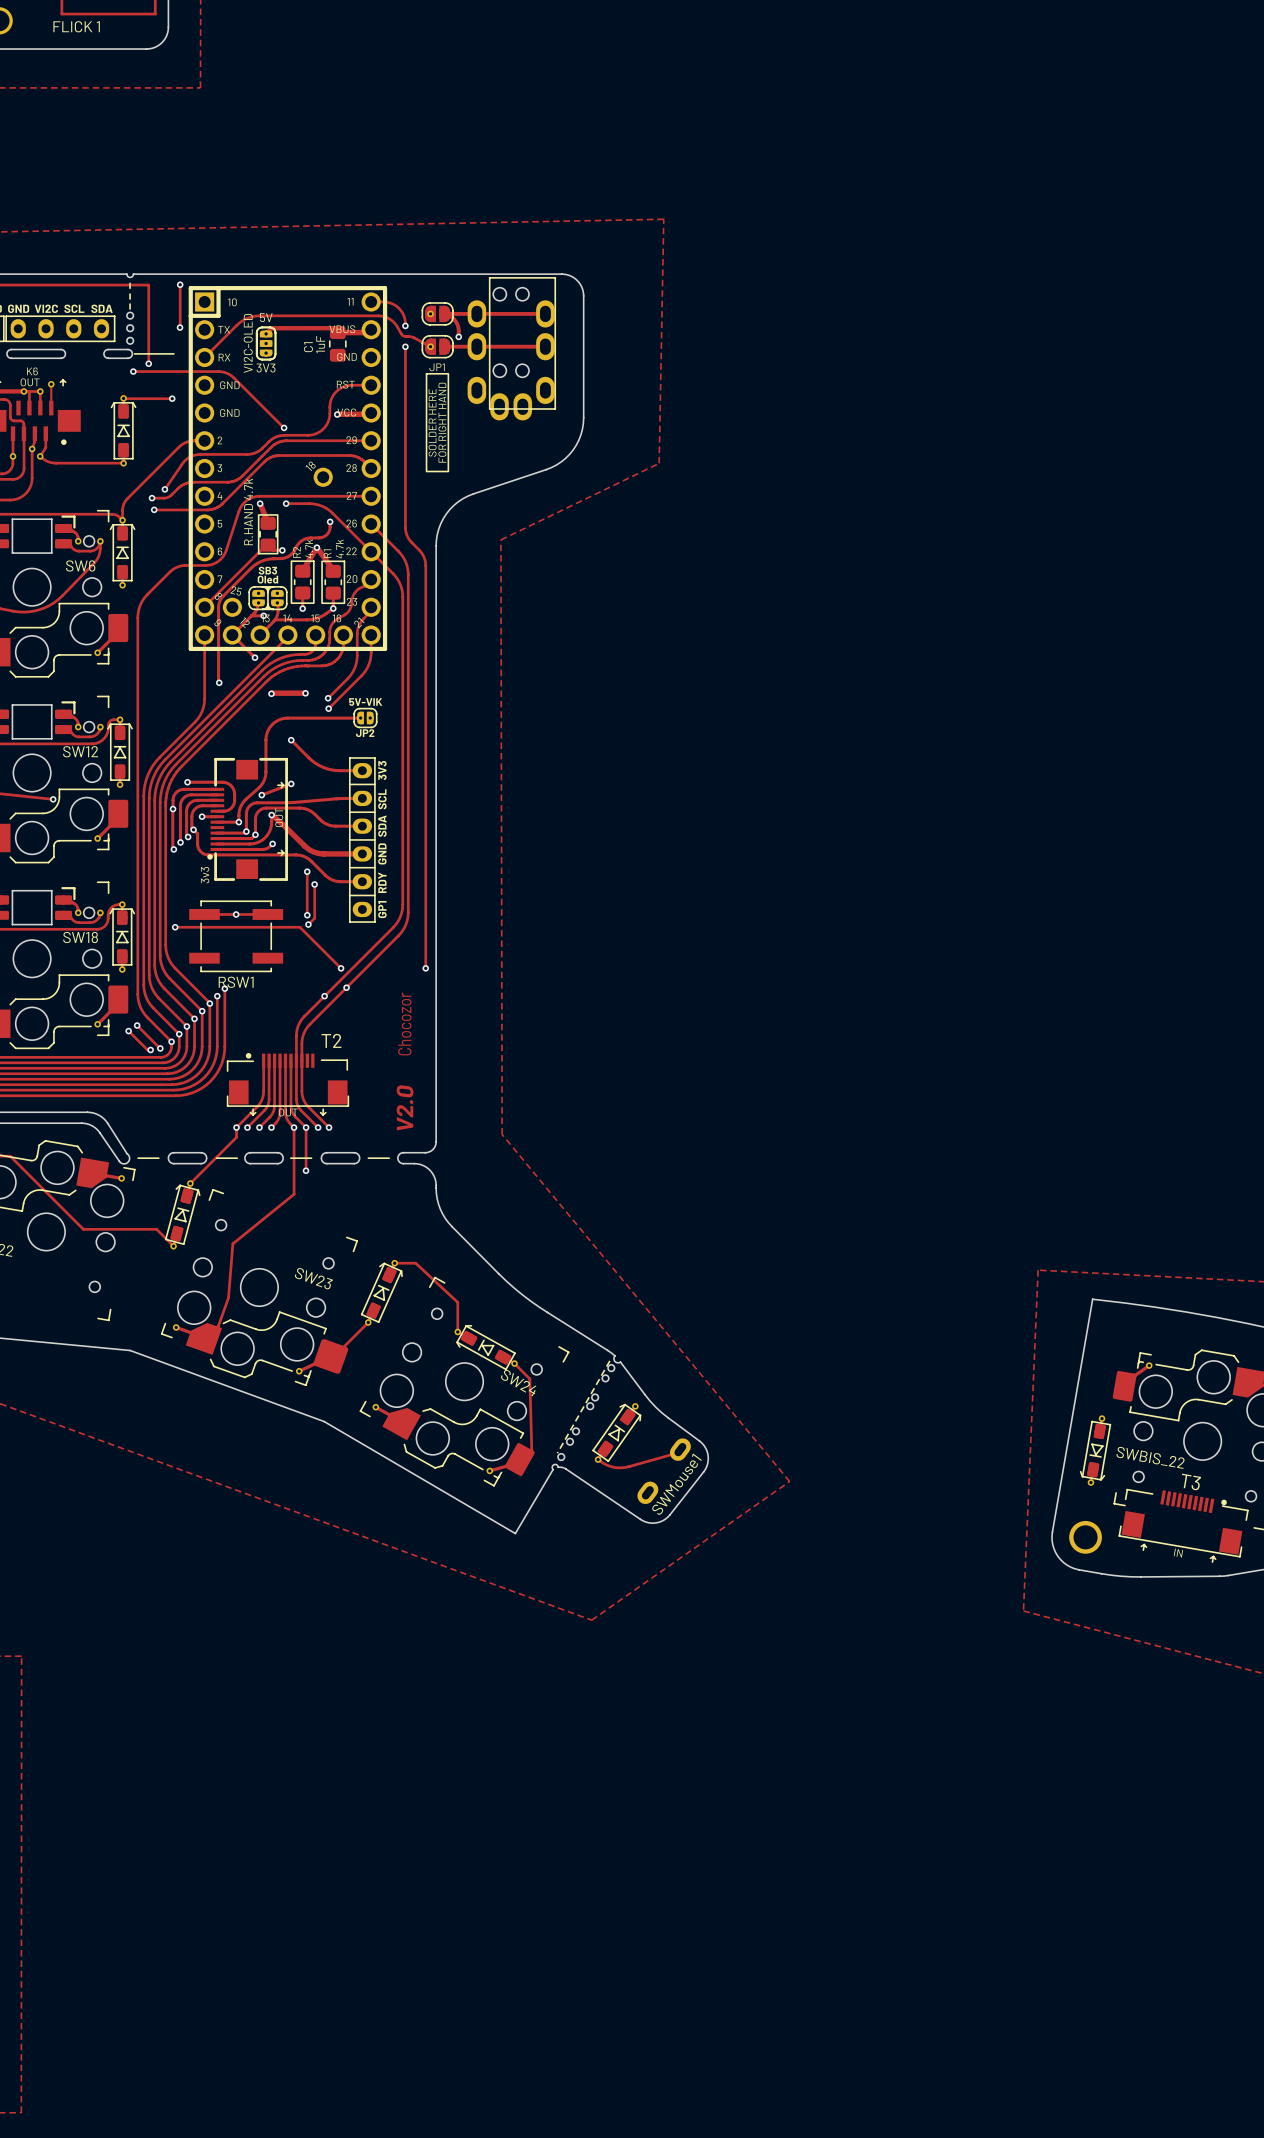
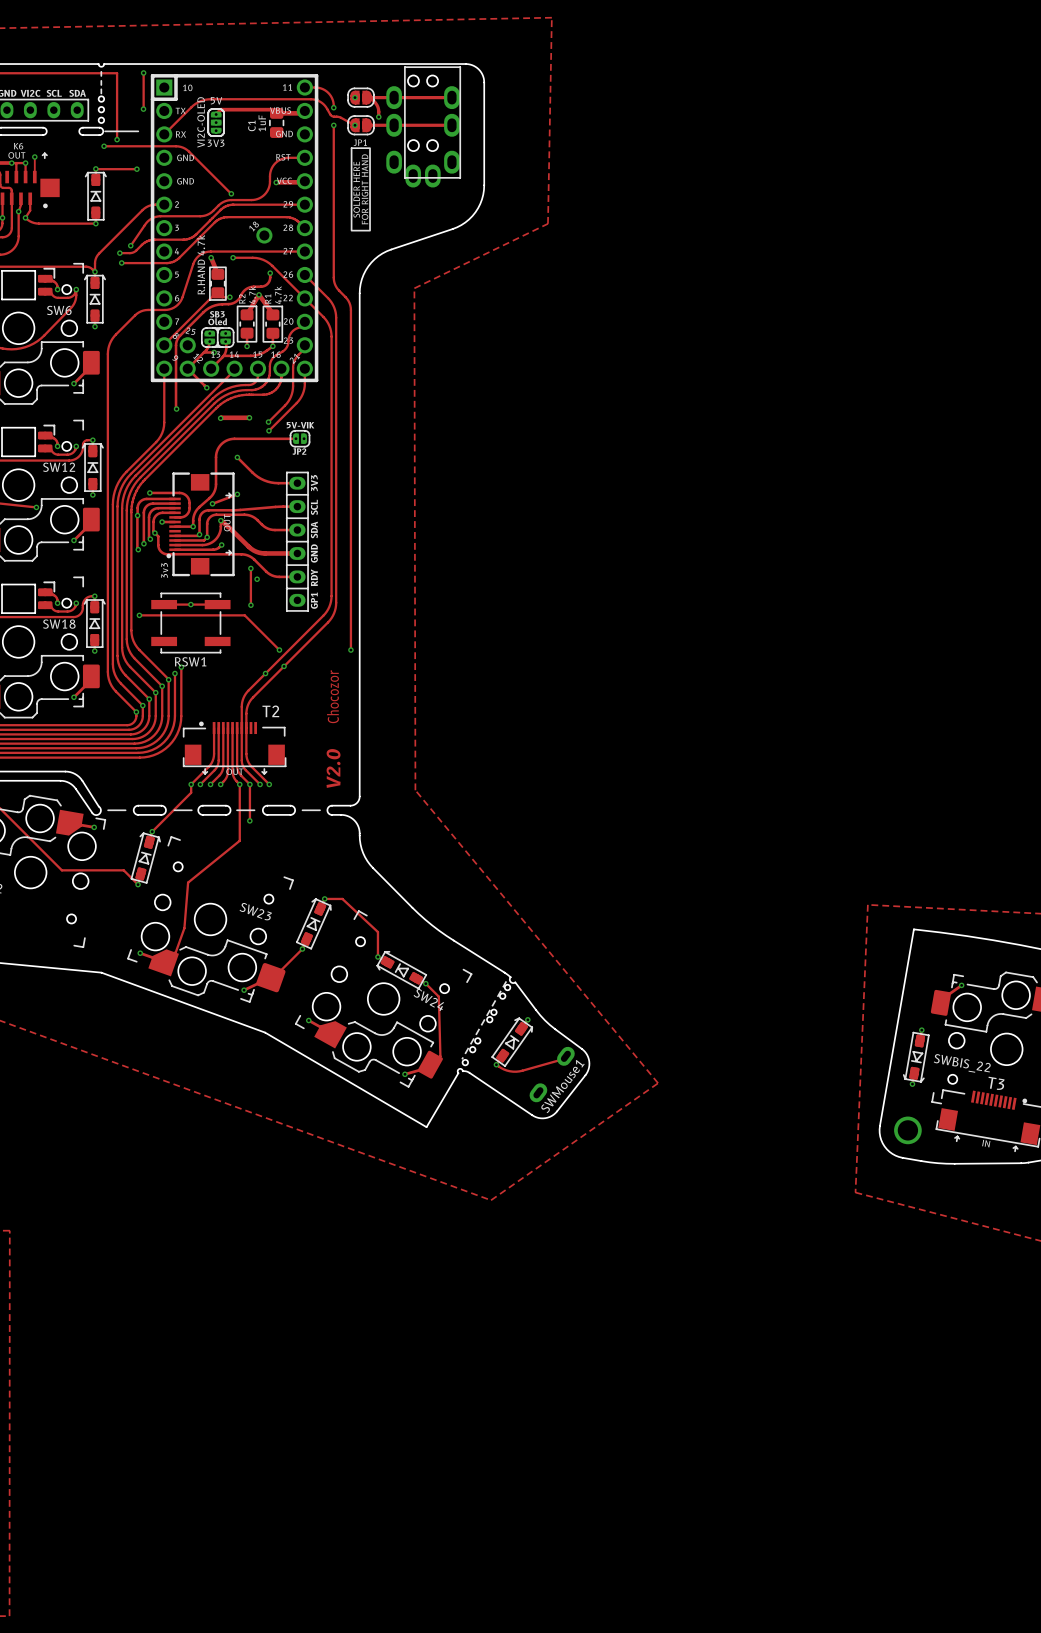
track: (314, 884) (314, 918) (308, 924) -> none
via: (308, 924) -> none
track: (137, 1025) (160, 1048) -> none
via: (137, 1025) -> none
track: (128, 1031) (147, 1049) (150, 1049) -> none
via: (128, 1031) -> none
via: (160, 1048) -> none
via: (150, 1049) -> none

